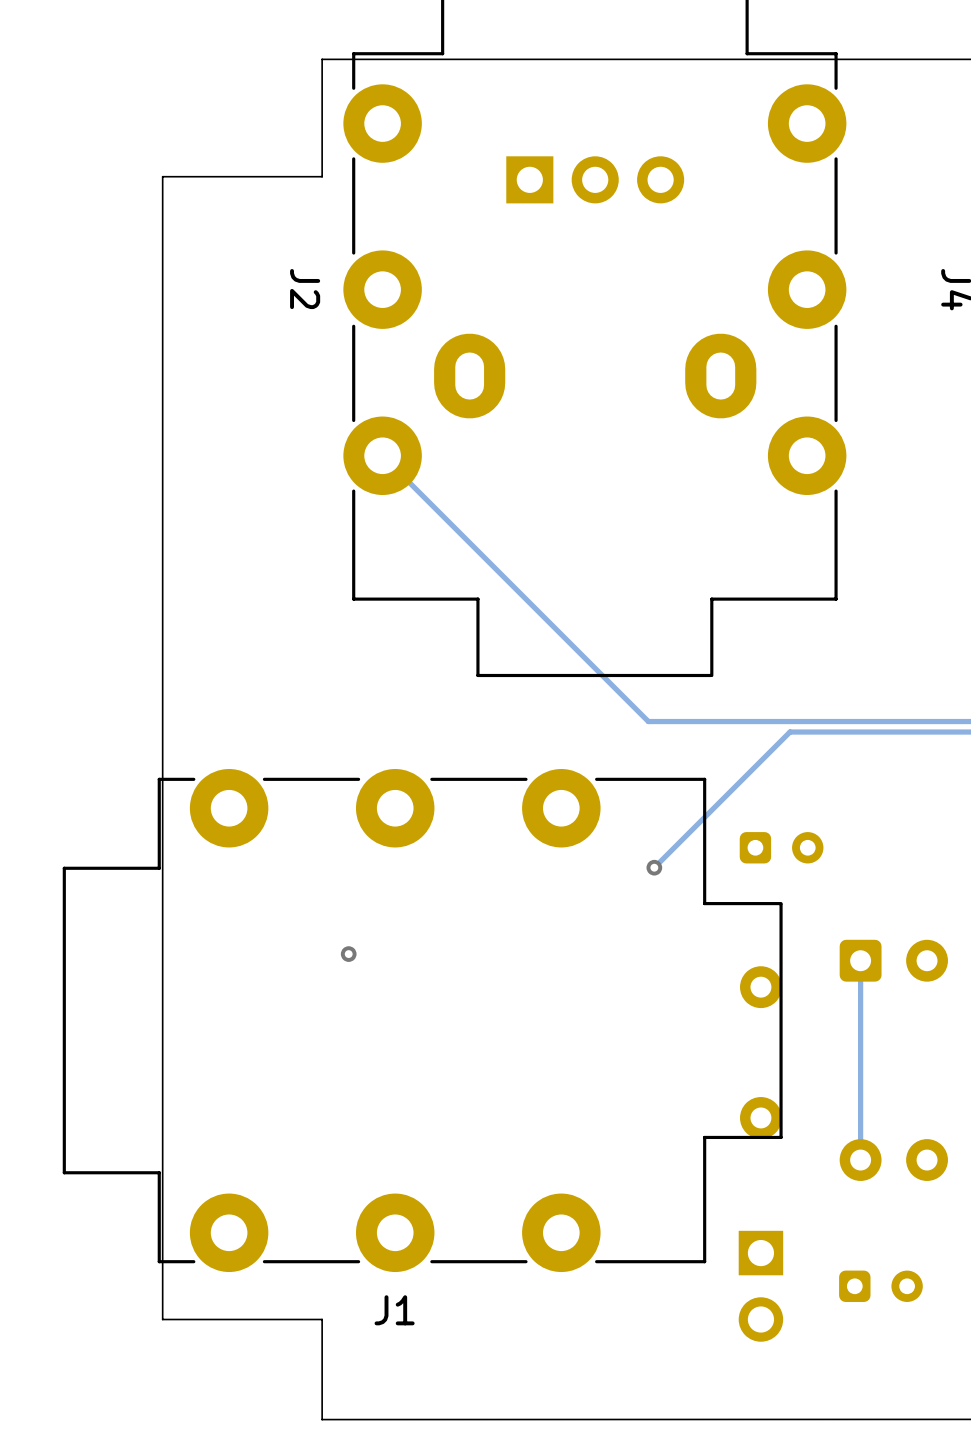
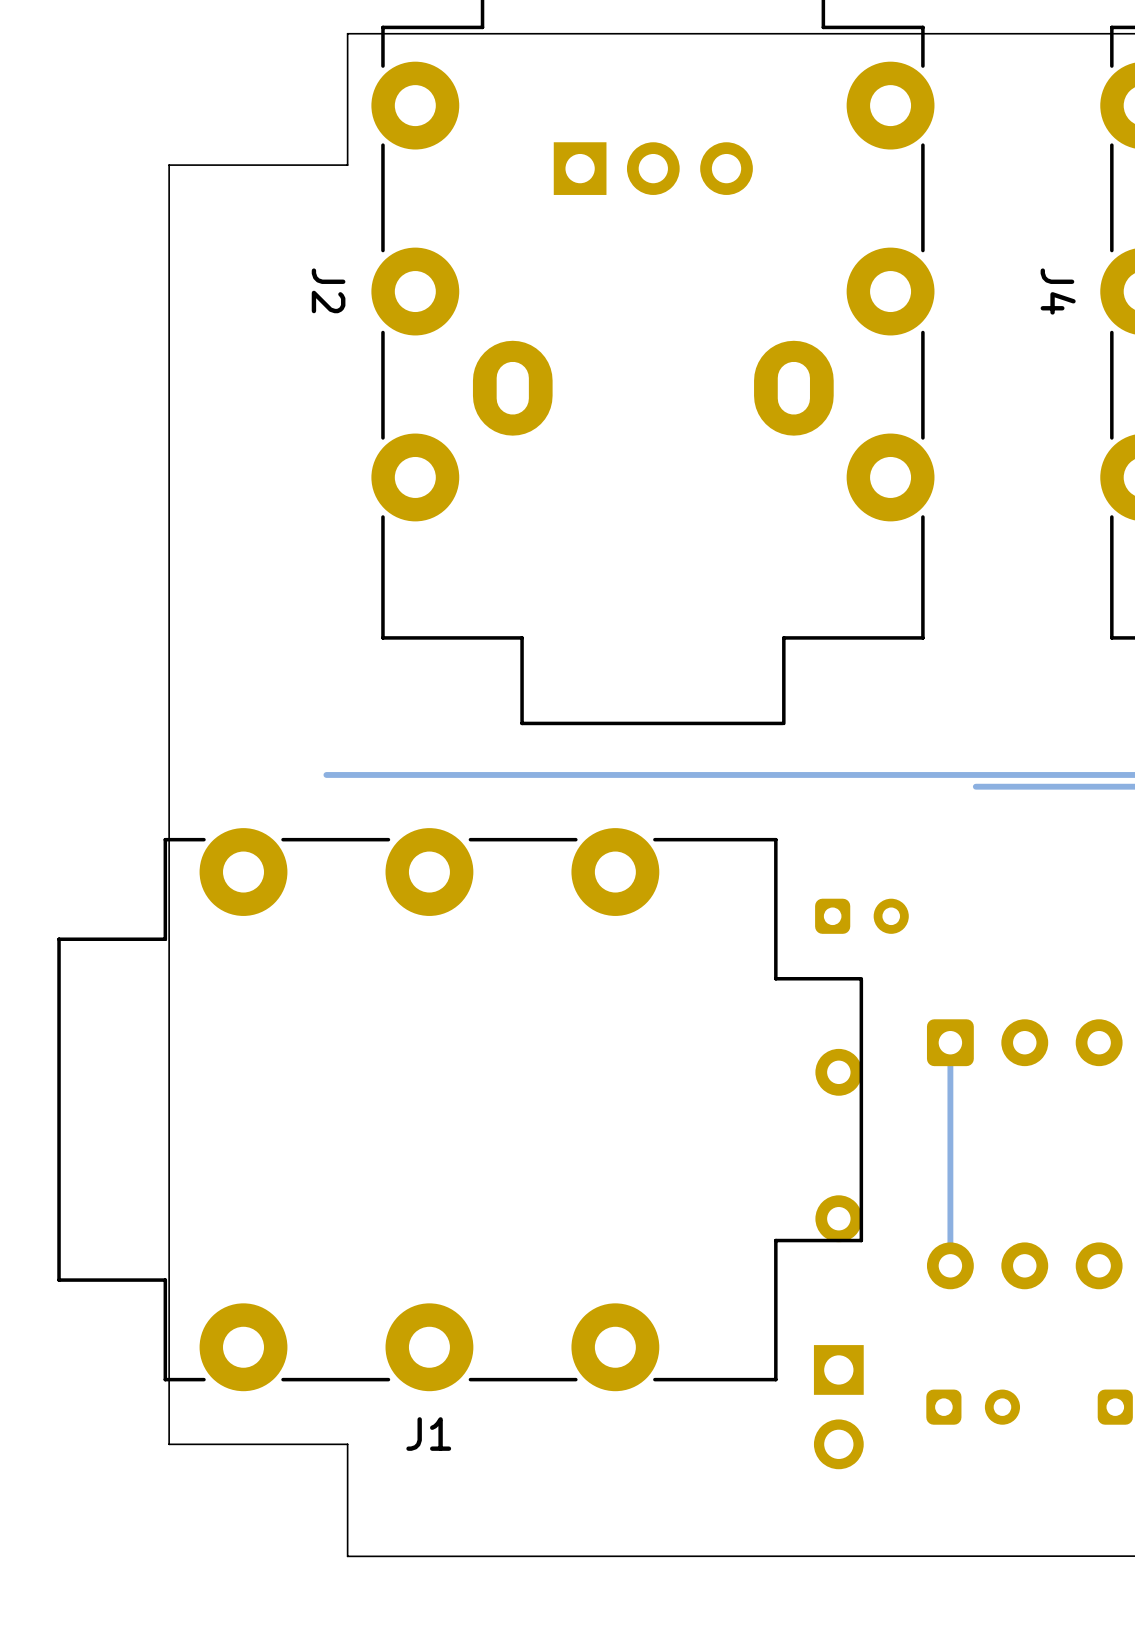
track: (382, 455) (648, 721) -> (326, 774) (712, 774)
track: (883, 732) (790, 732) (654, 867) -> none
via: (654, 867) -> none
via: (348, 954) -> none

